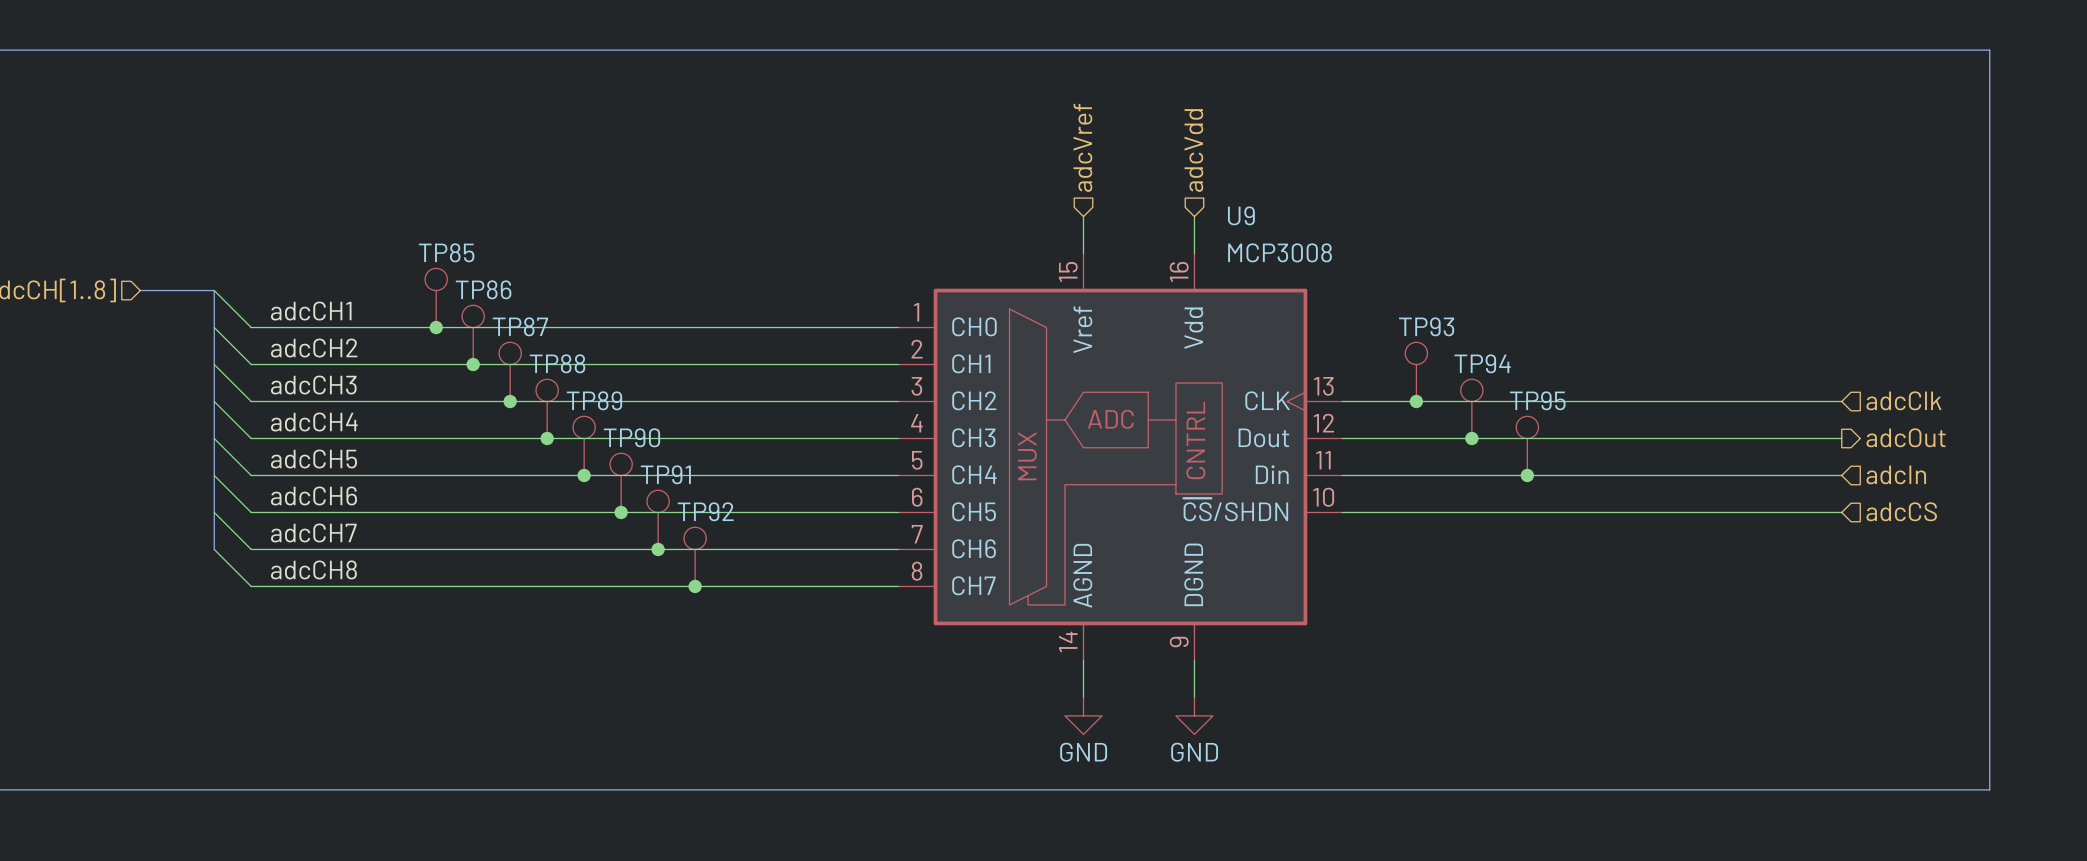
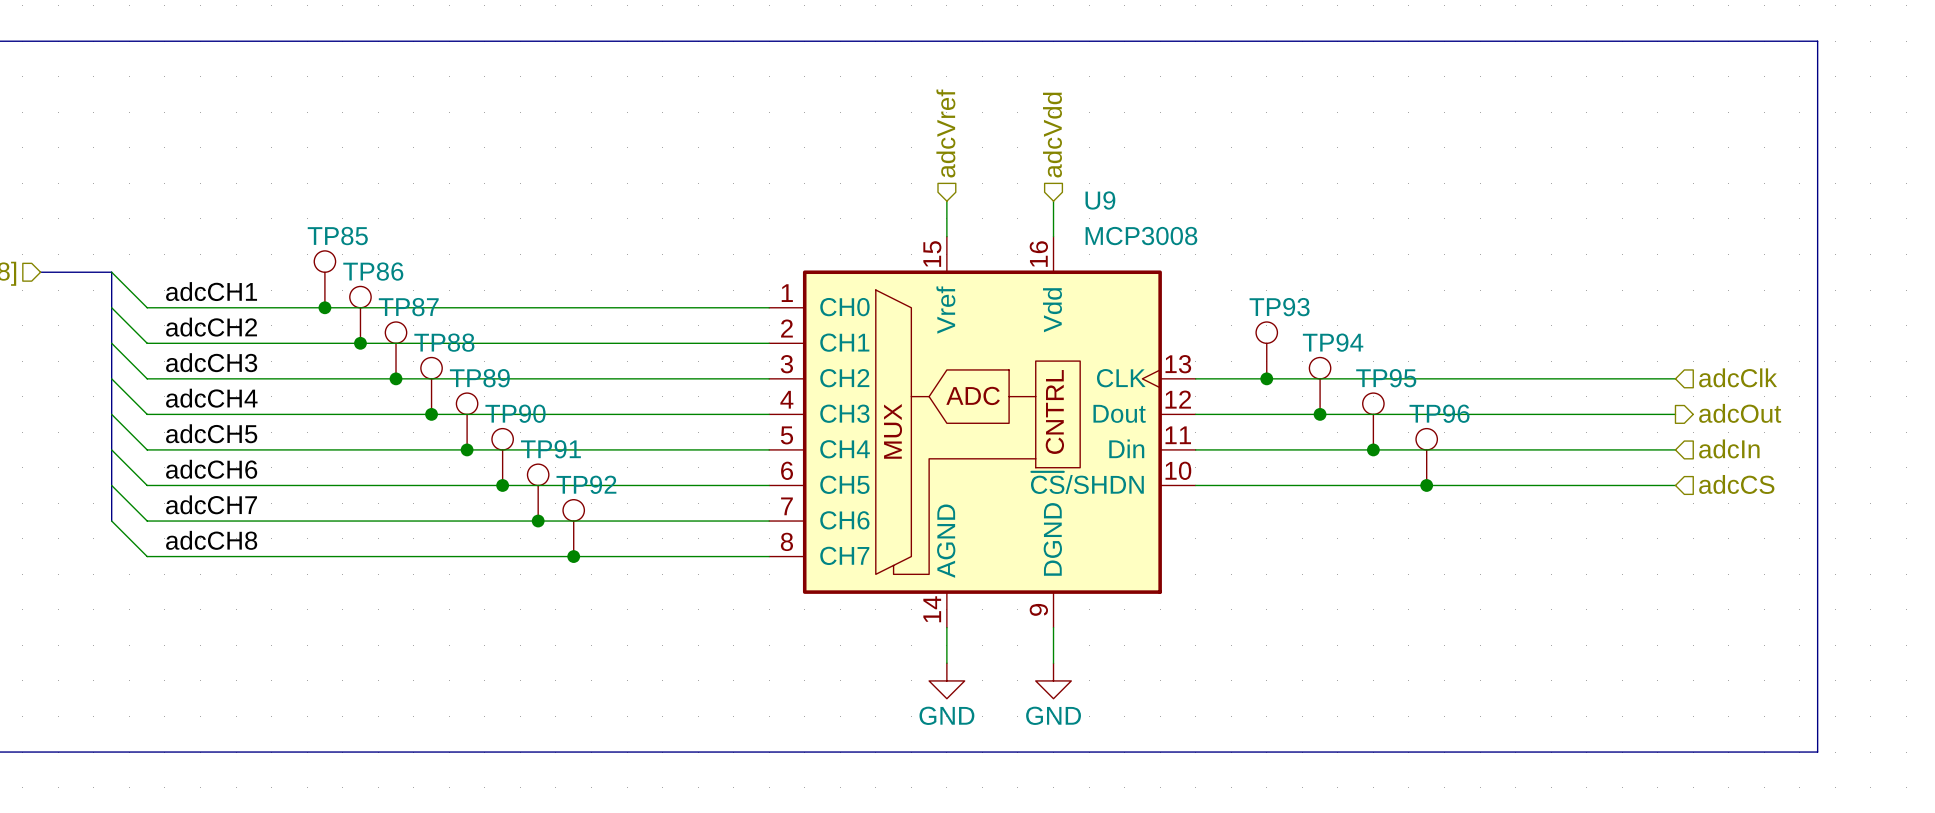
TP96: none -> (1426, 457)
junction: none -> (1426, 485)

